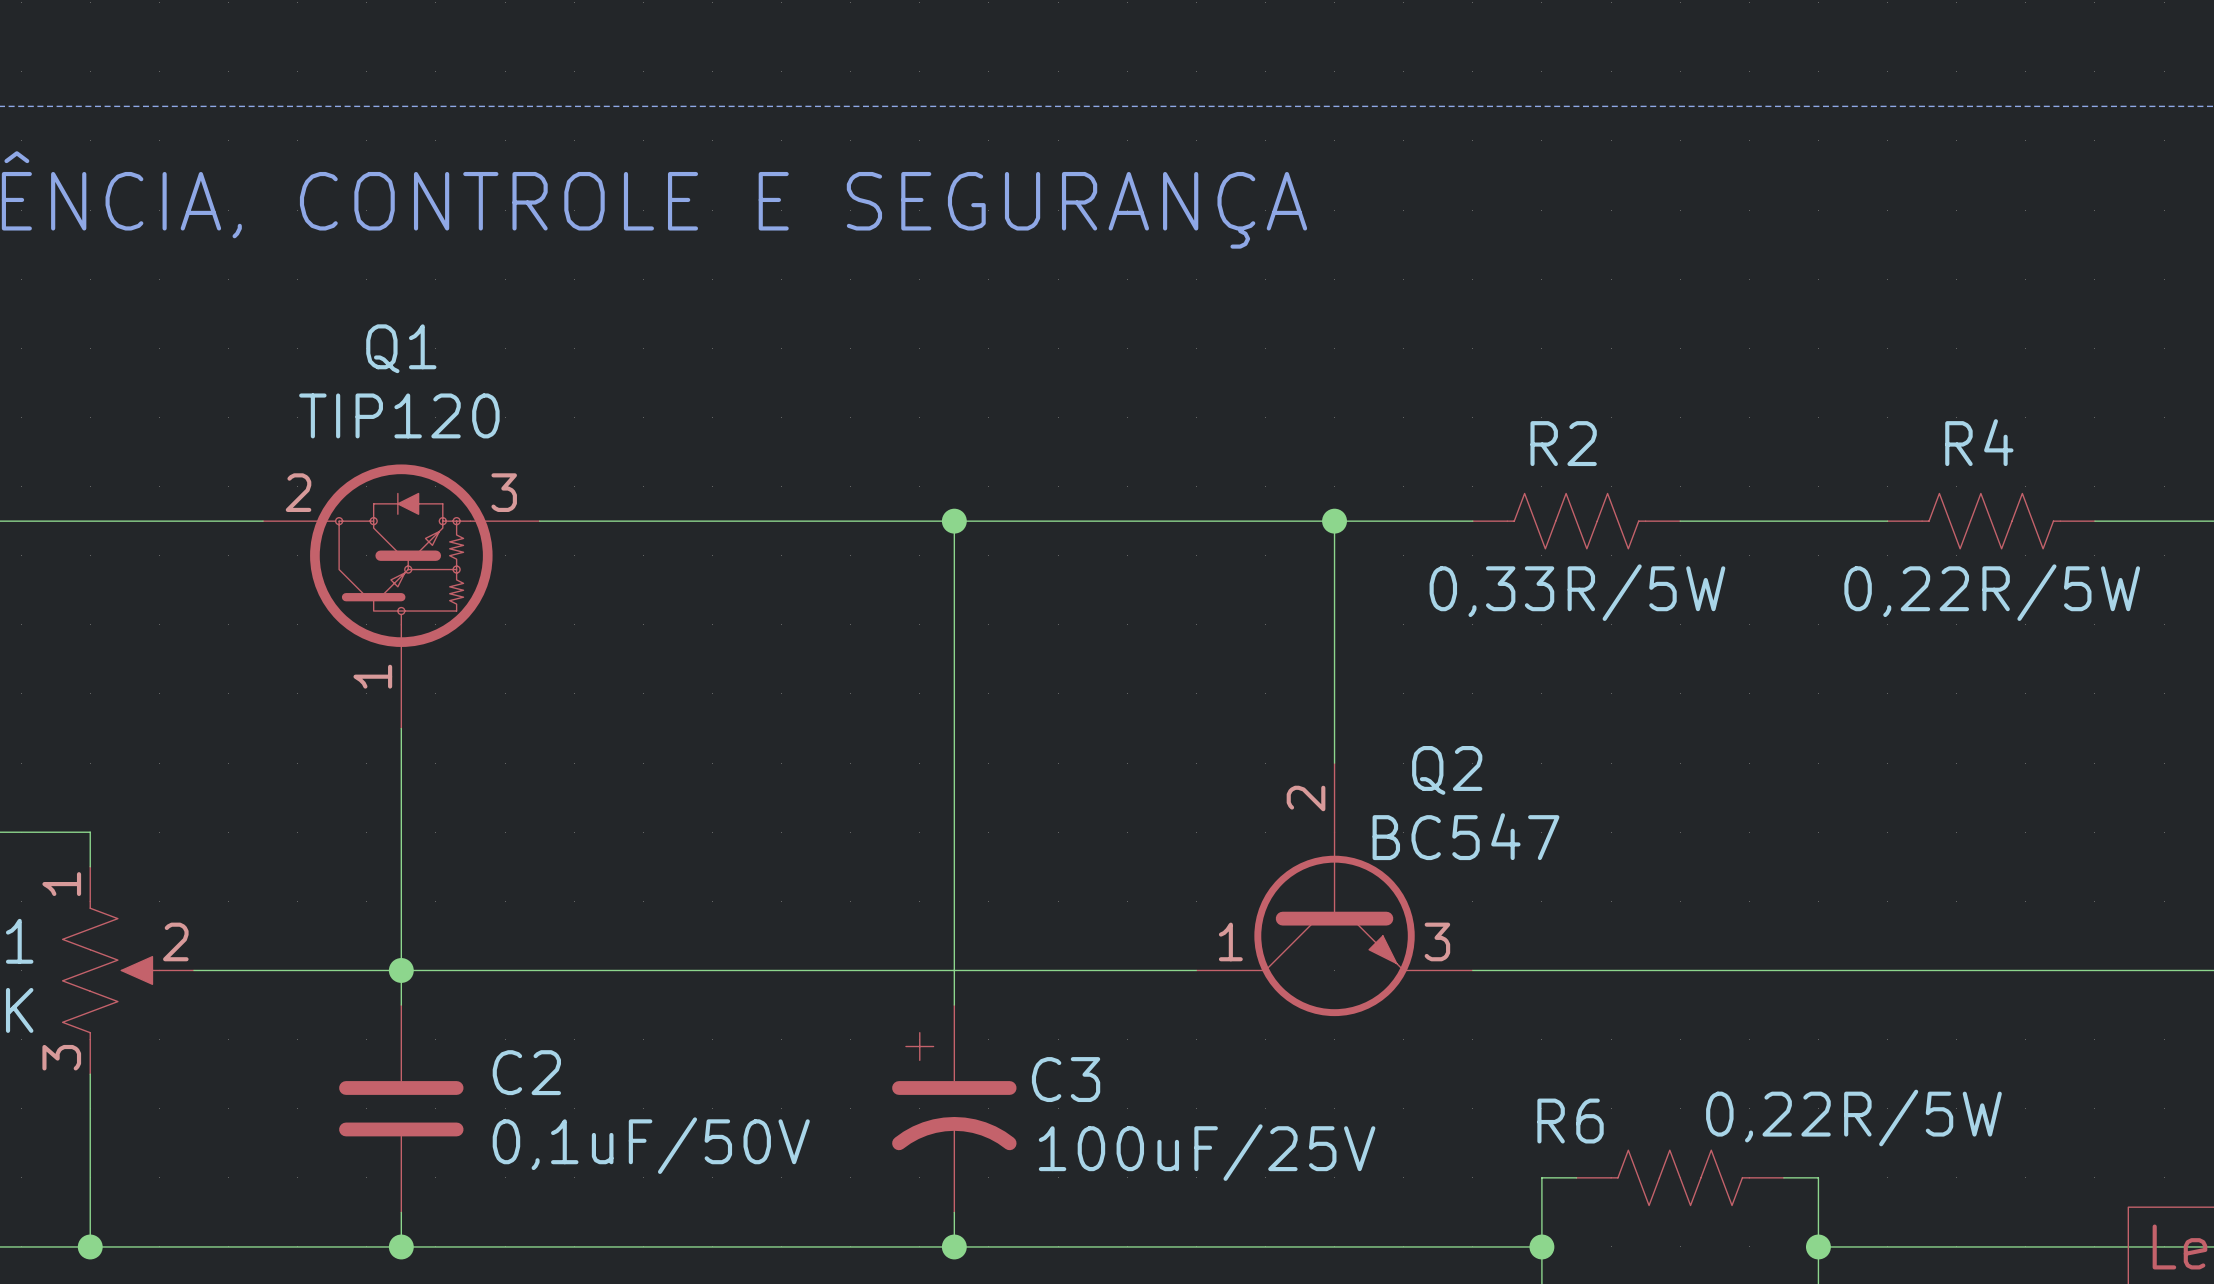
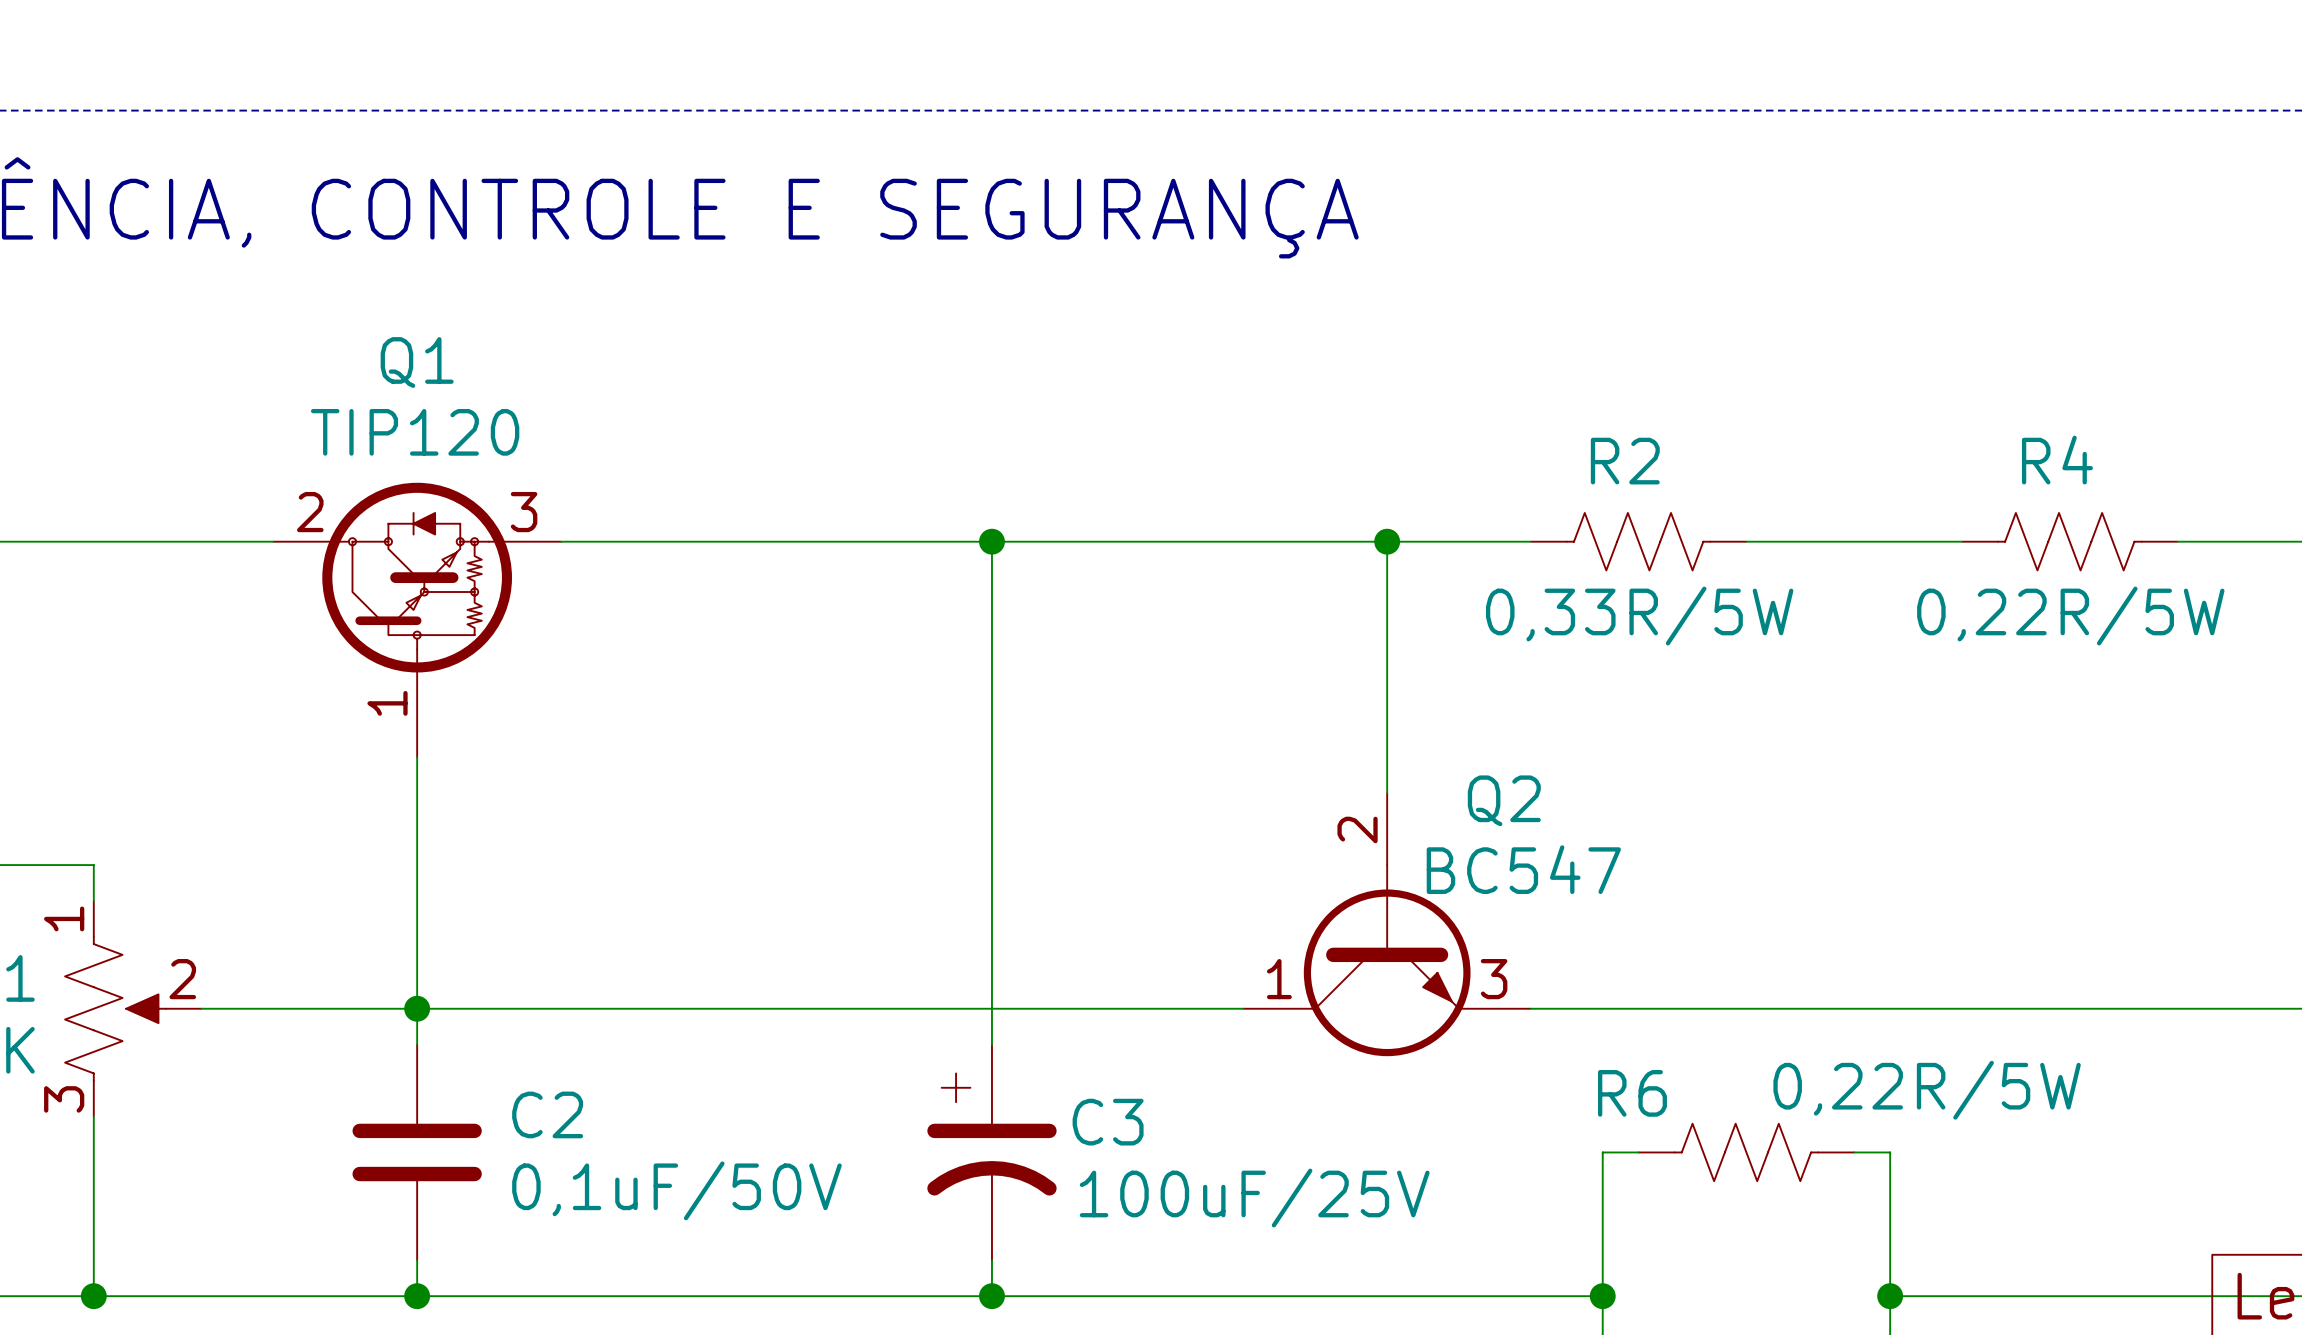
wire: (1541, 1177) (1576, 1177) -> (1602, 1224) (1602, 1152) (1638, 1152)
R6 position: (1680, 1177) -> (1746, 1152)
wire: (1783, 1177) (1818, 1177) -> (1854, 1152) (1890, 1152) (1890, 1224)

